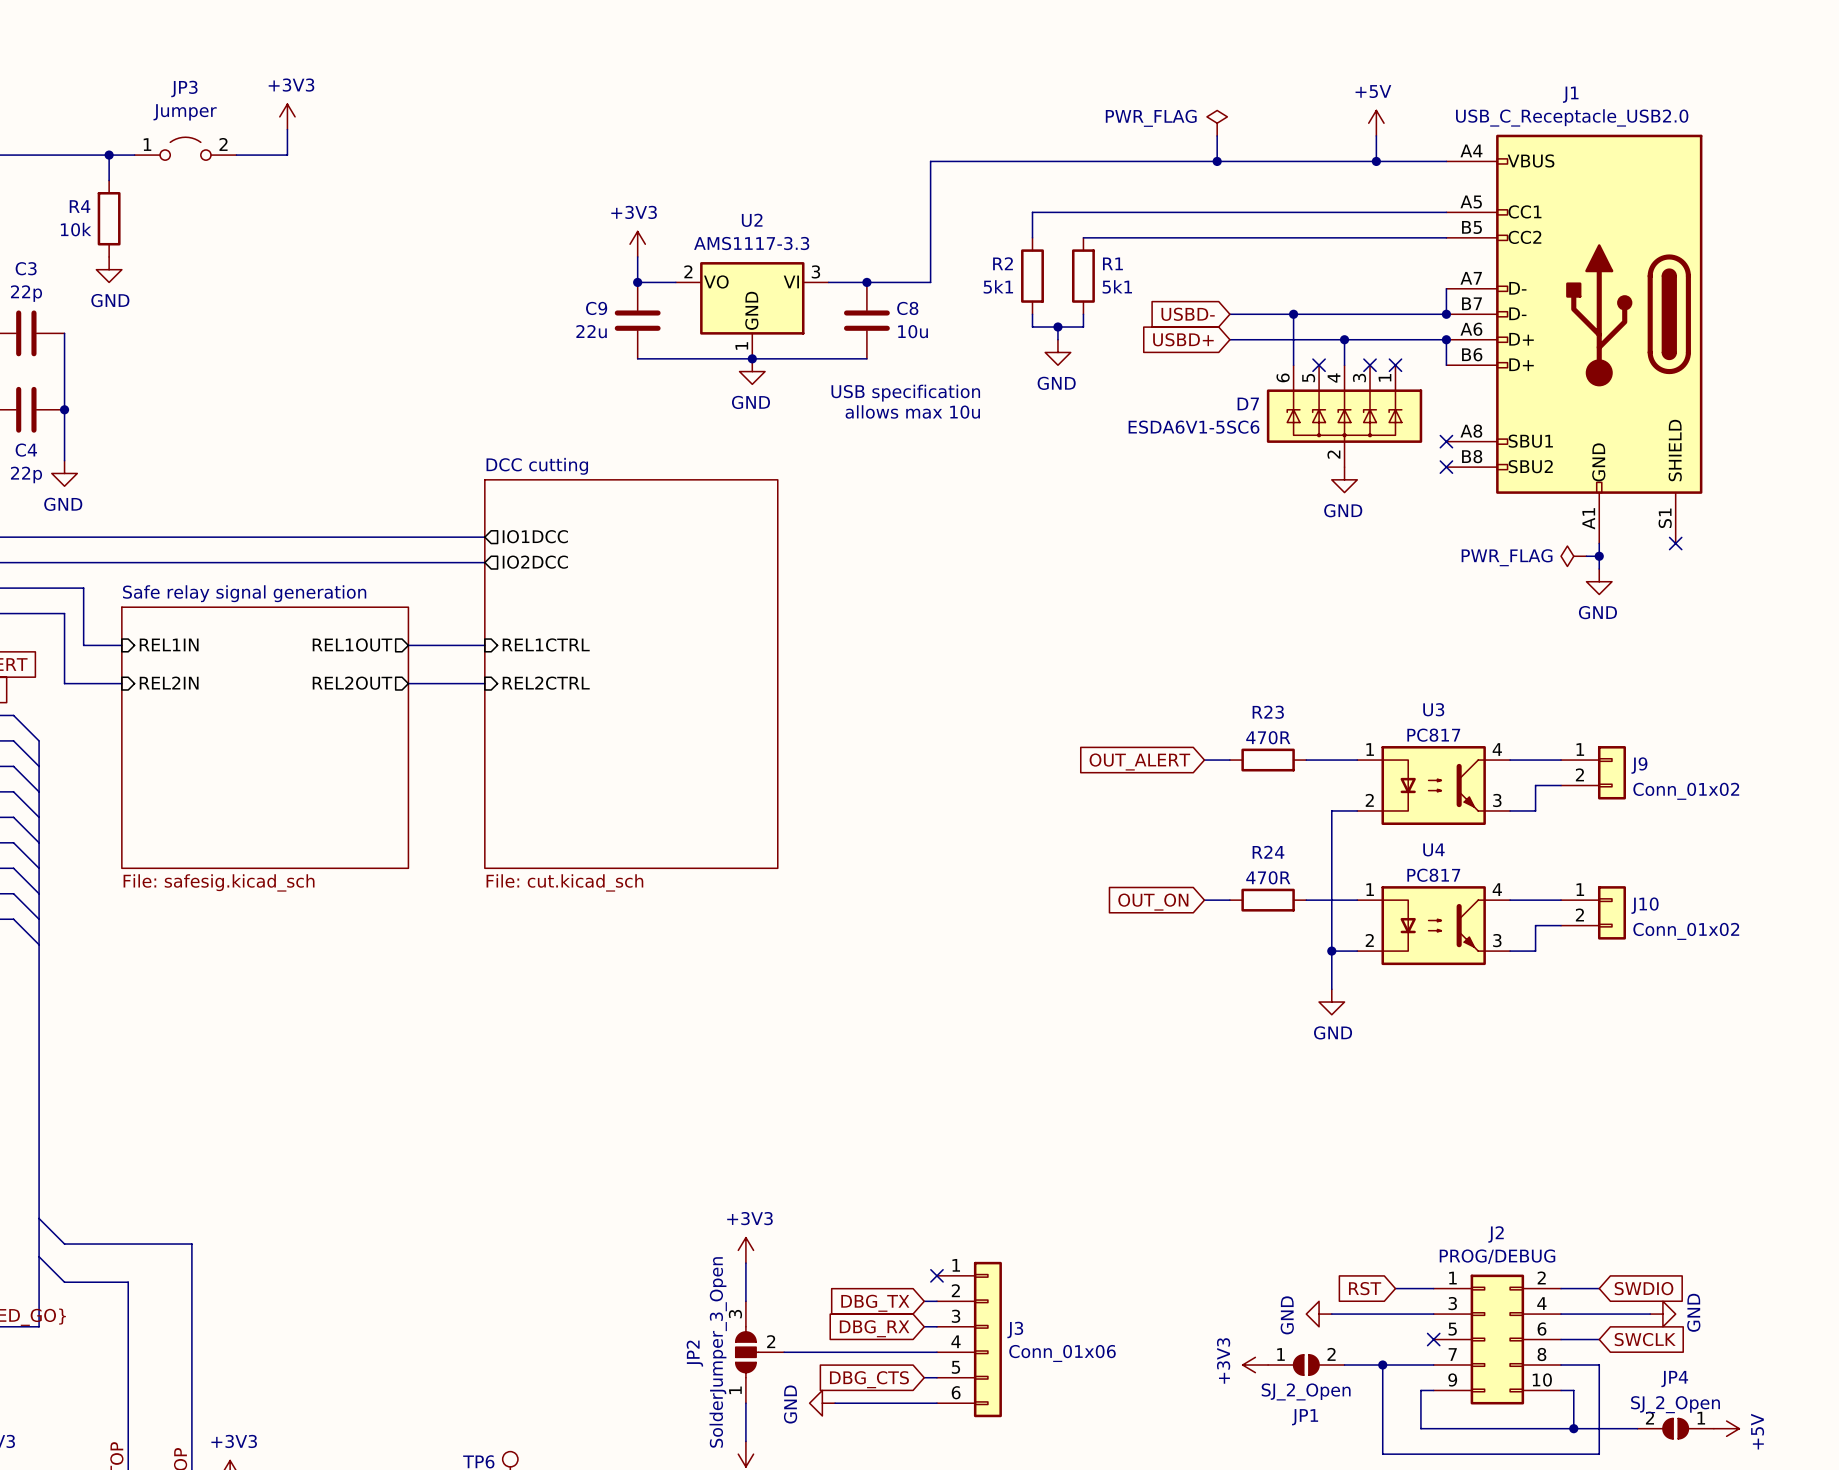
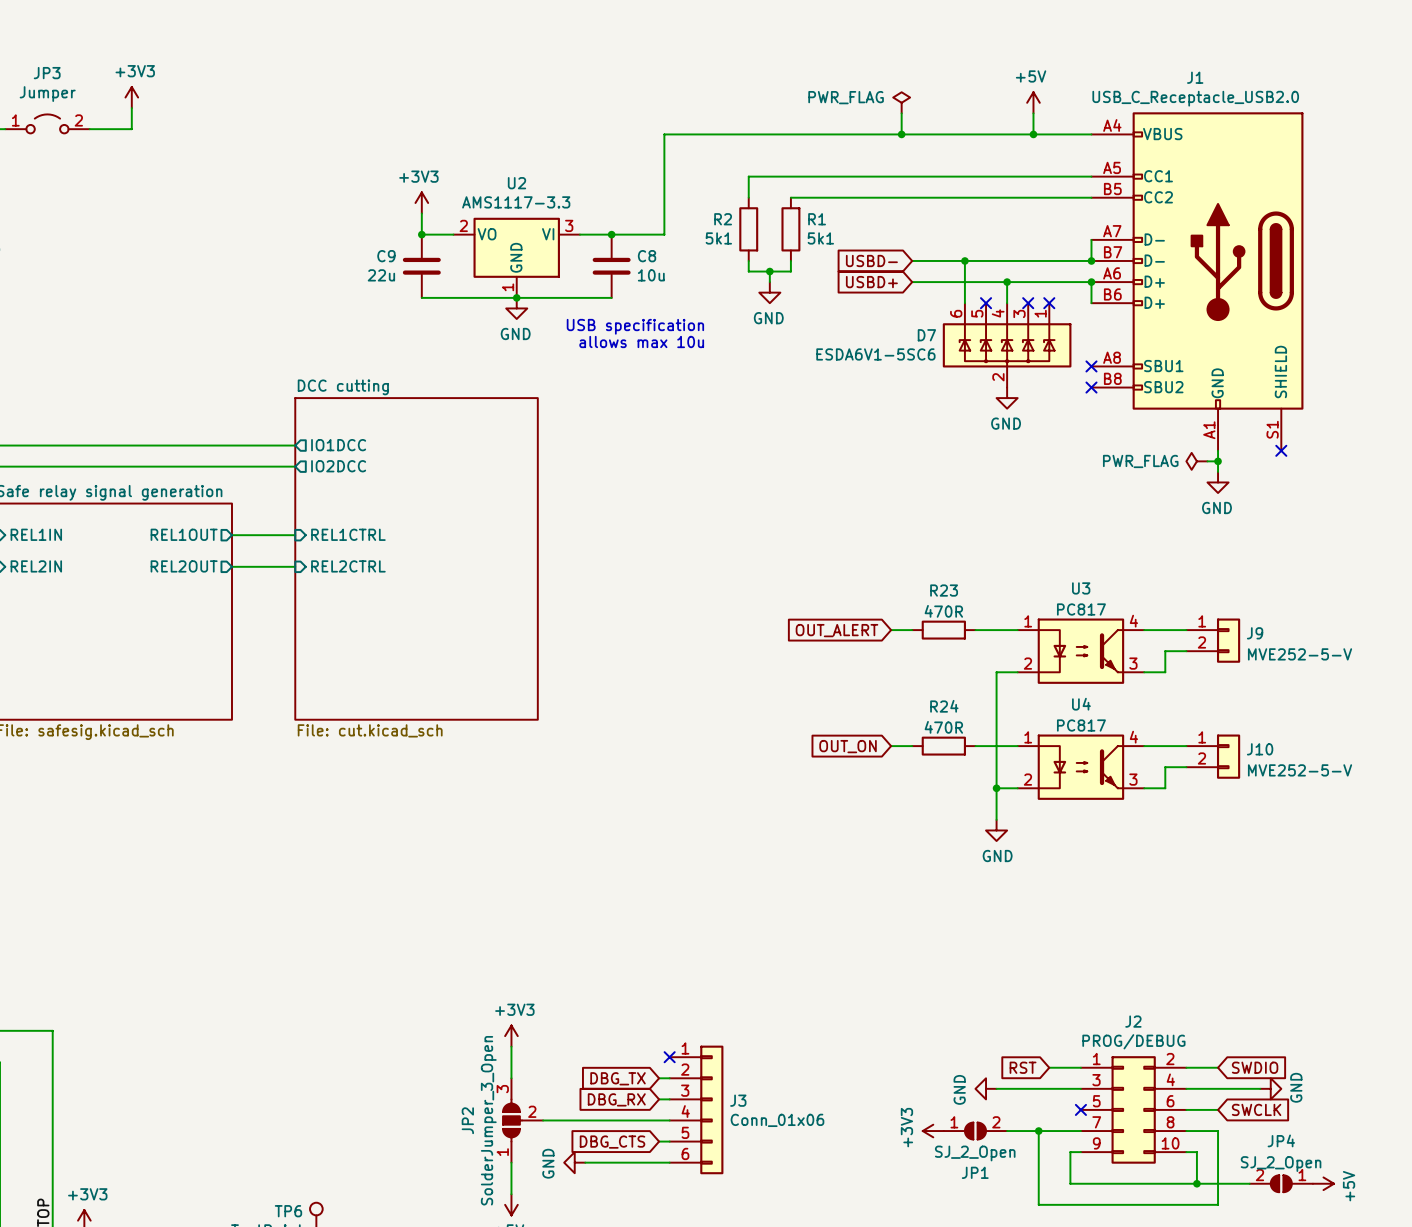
J9 value: Conn_01x02 (1686, 791) -> MVE252-5-V (1300, 654)
J10 value: Conn_01x02 (1686, 931) -> MVE252-5-V (1300, 770)

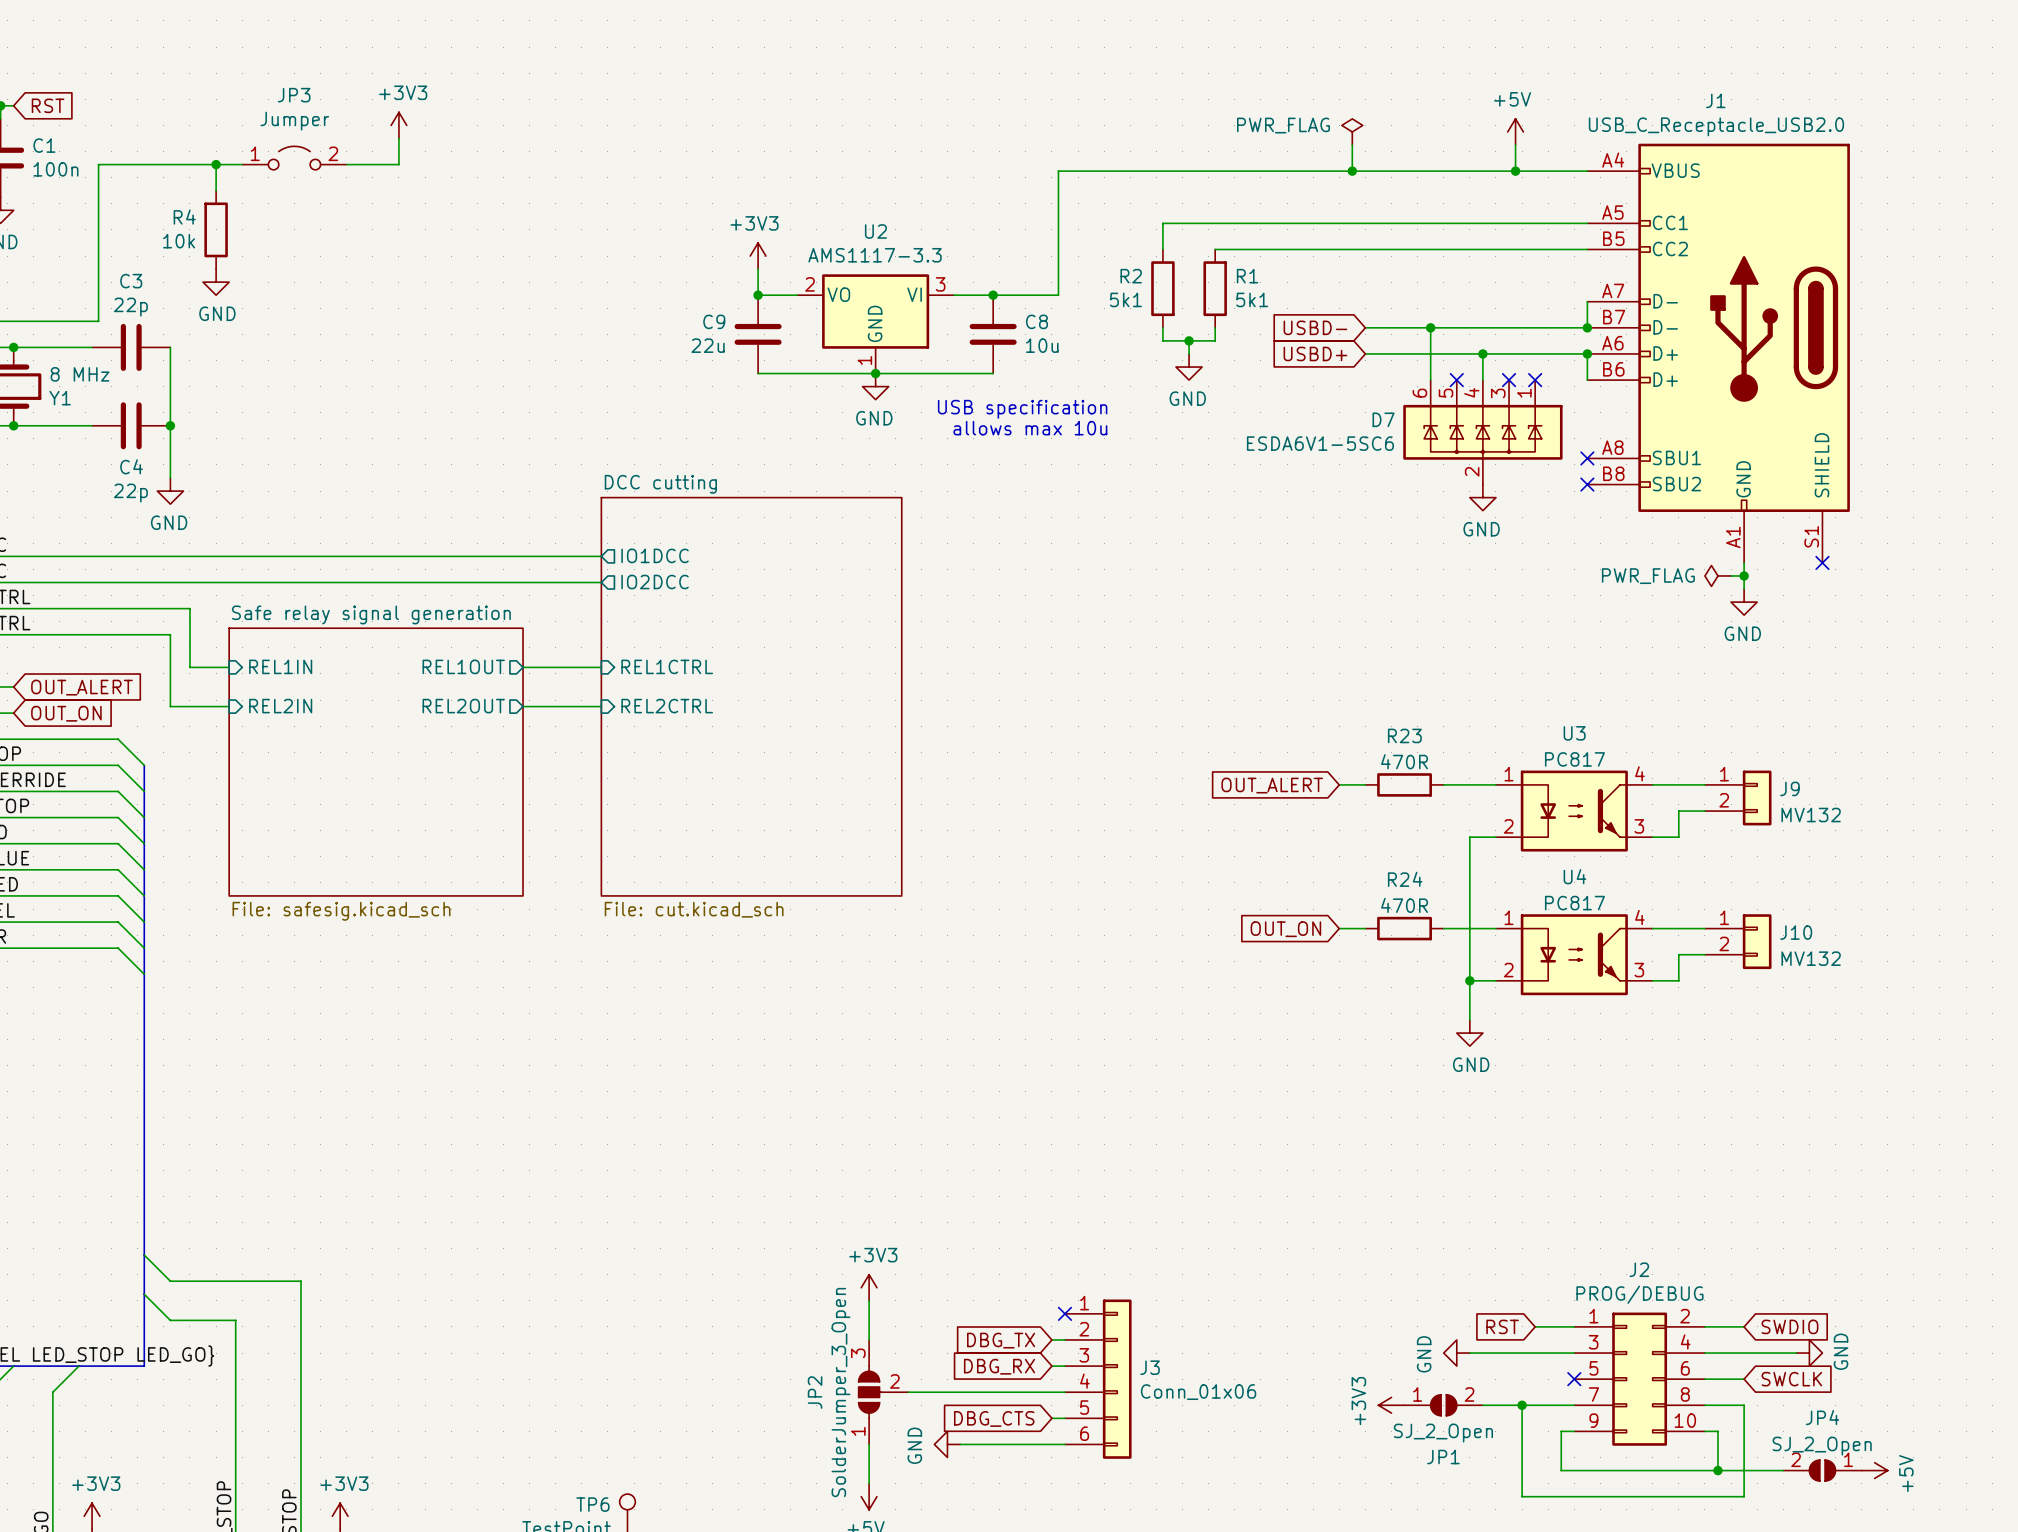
J9 value: MVE252-5-V (1300, 654) -> MV132 (1811, 815)
J10 value: MVE252-5-V (1300, 770) -> MV132 (1811, 958)

